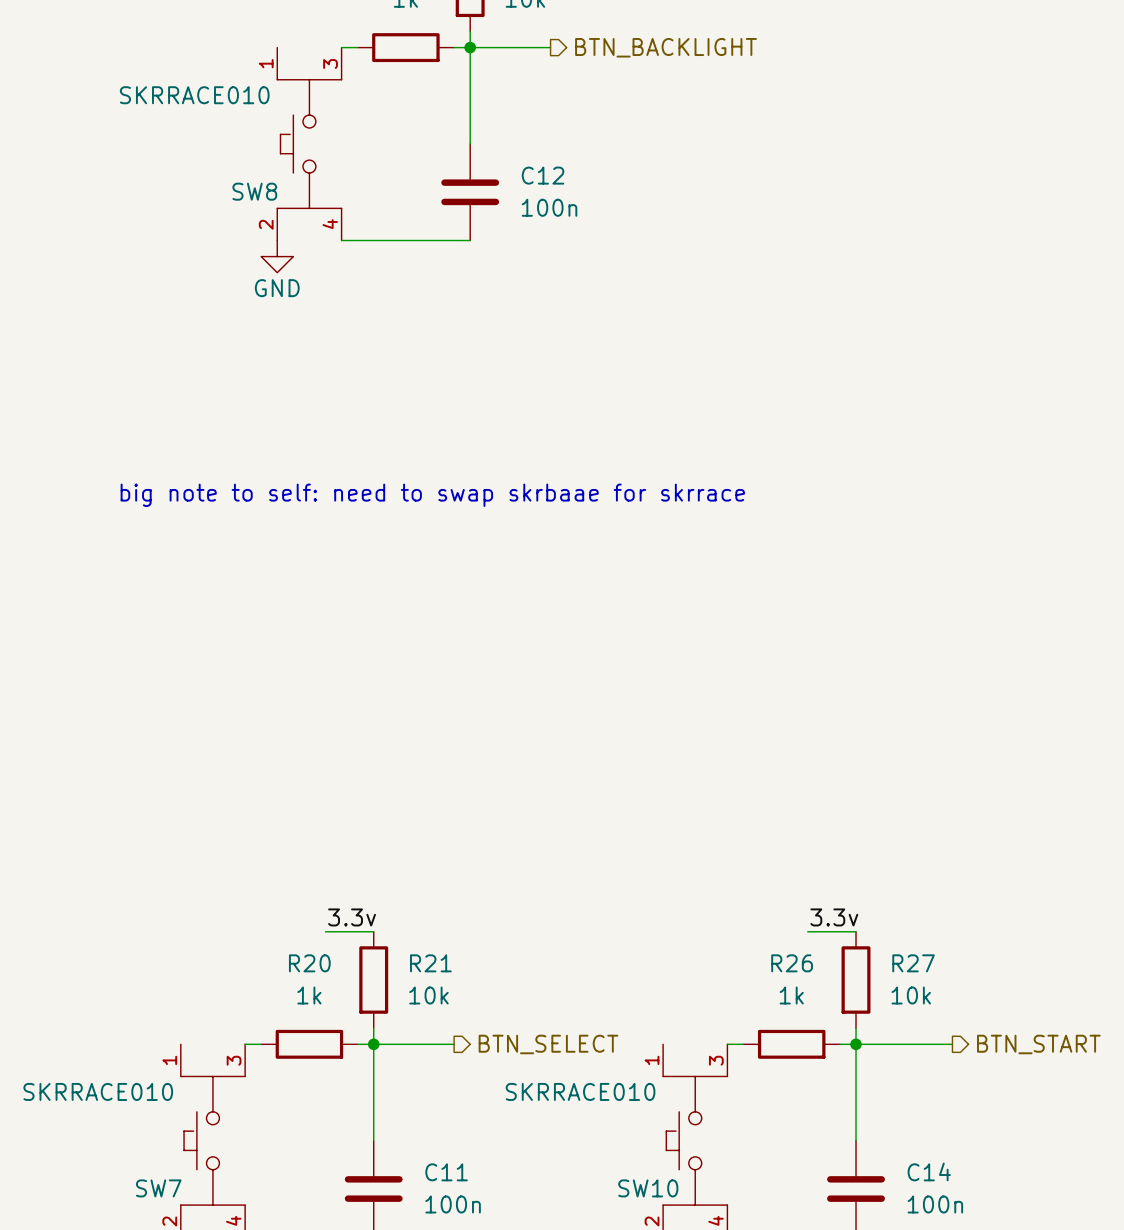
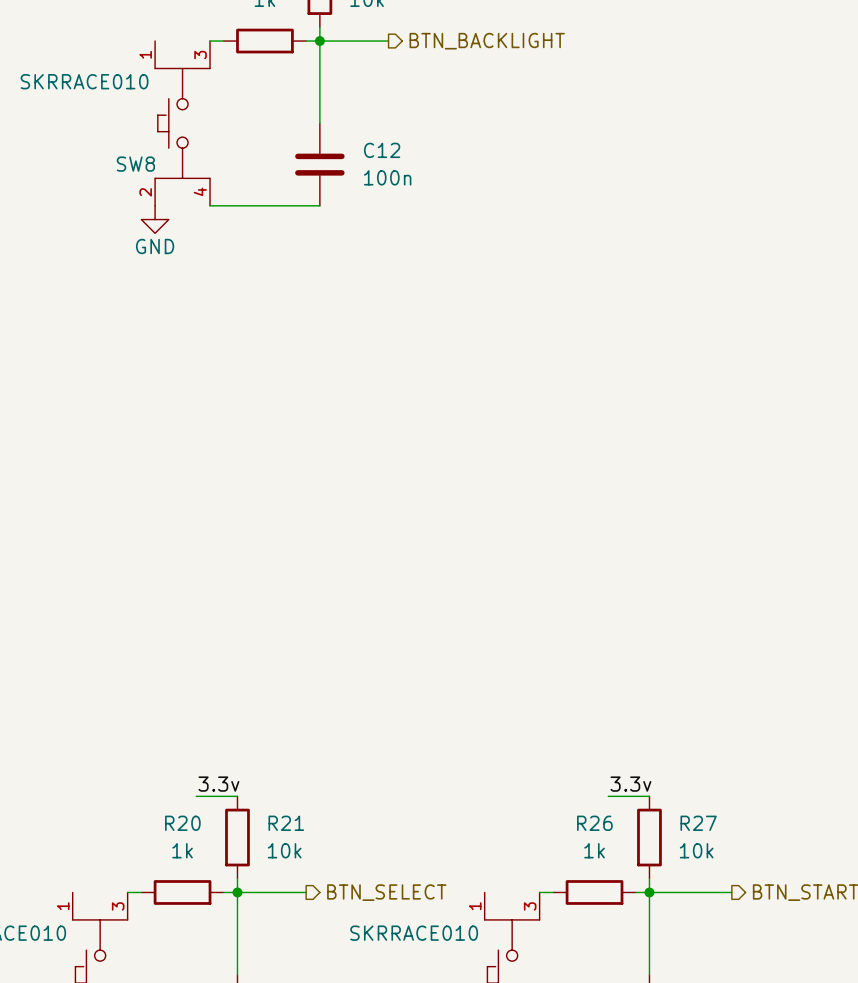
text: big note to self: need to swap skrbaae for skrrace (432, 495) -> none

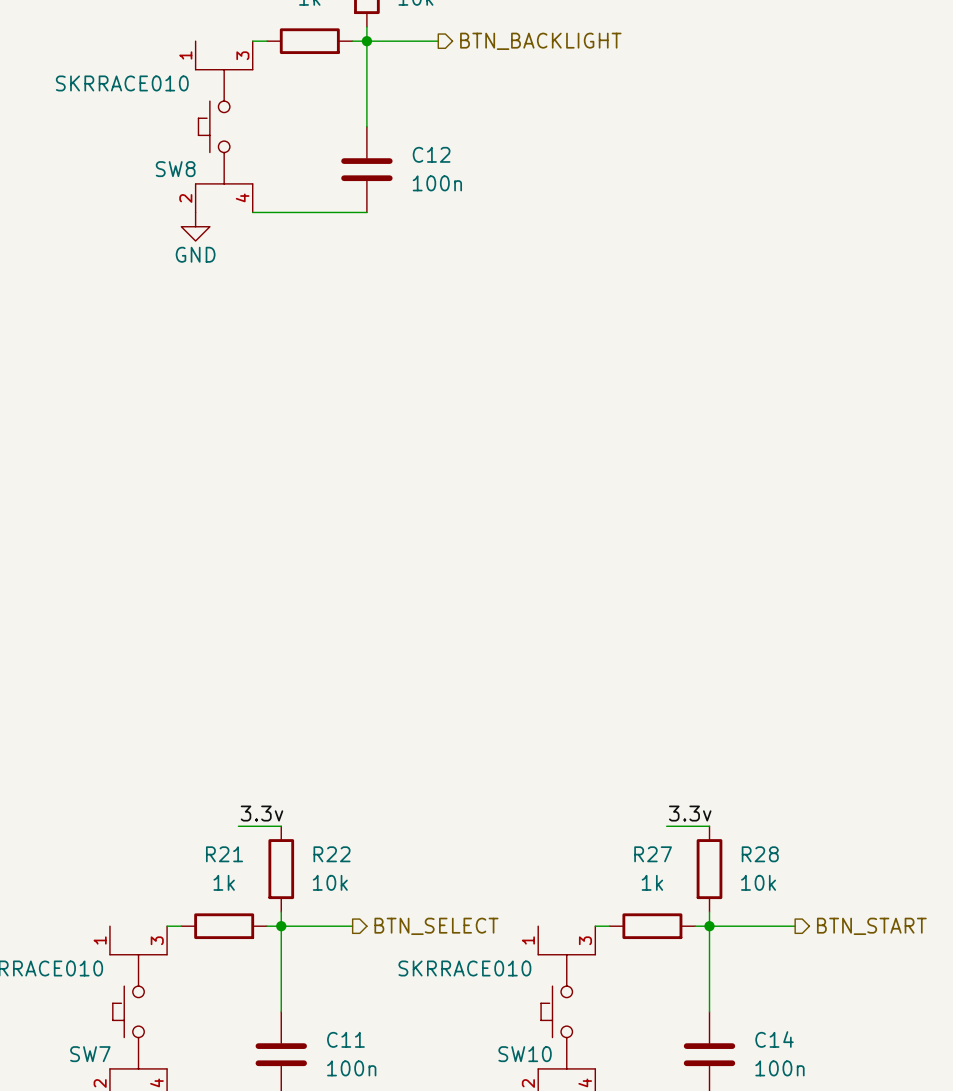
R20 name: R20 (182, 823) -> R21 (224, 854)
R21 name: R21 (286, 823) -> R22 (332, 854)
R26 name: R26 (594, 823) -> R27 (653, 854)
R27 name: R27 (698, 823) -> R28 (760, 854)

